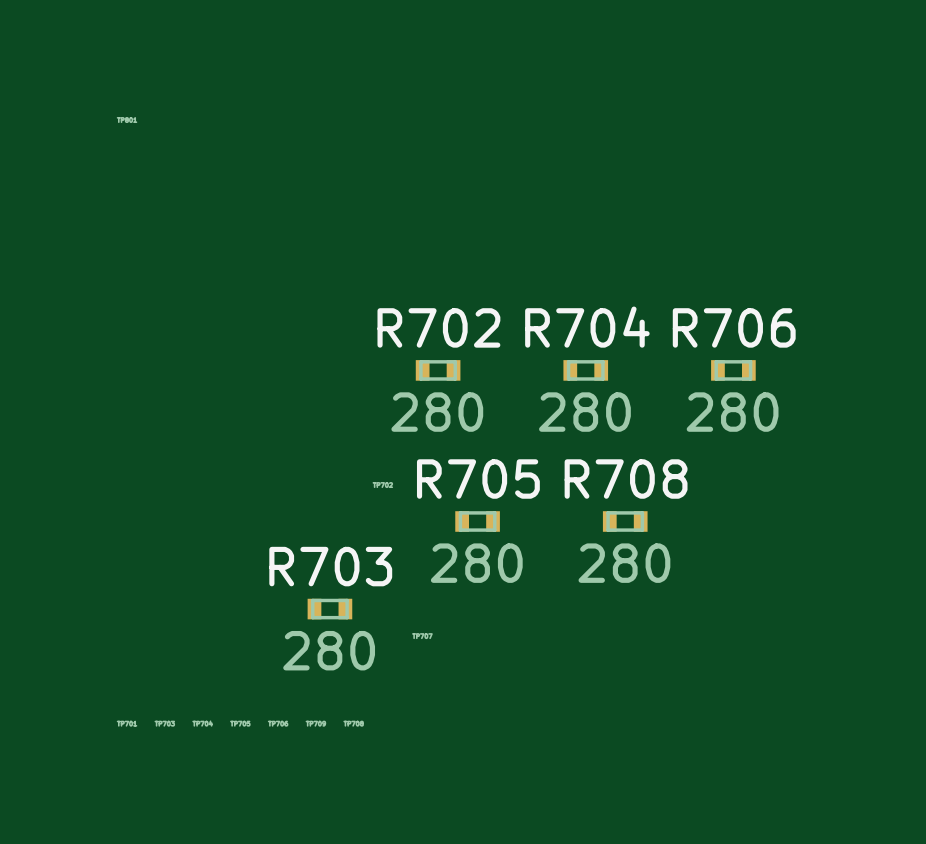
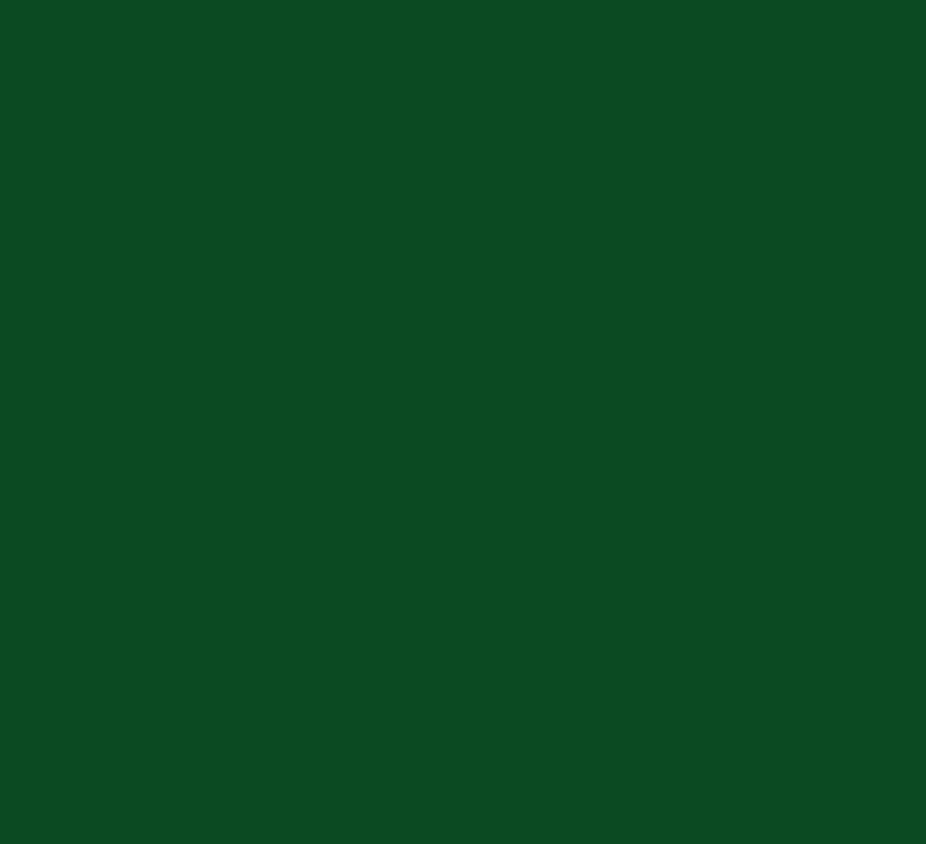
part: (127, 120) -> none
R702: 280 (438, 370) -> none
R704: 280 (585, 370) -> none
R706: 280 (733, 370) -> none
part: (382, 485) -> none
R705: 280 (477, 521) -> none
R708: 280 (625, 521) -> none
R703: 280 (329, 609) -> none
part: (422, 636) -> none
part: (127, 723) -> none
part: (164, 723) -> none
part: (202, 723) -> none
part: (240, 723) -> none
part: (278, 723) -> none
part: (315, 723) -> none
part: (353, 723) -> none

